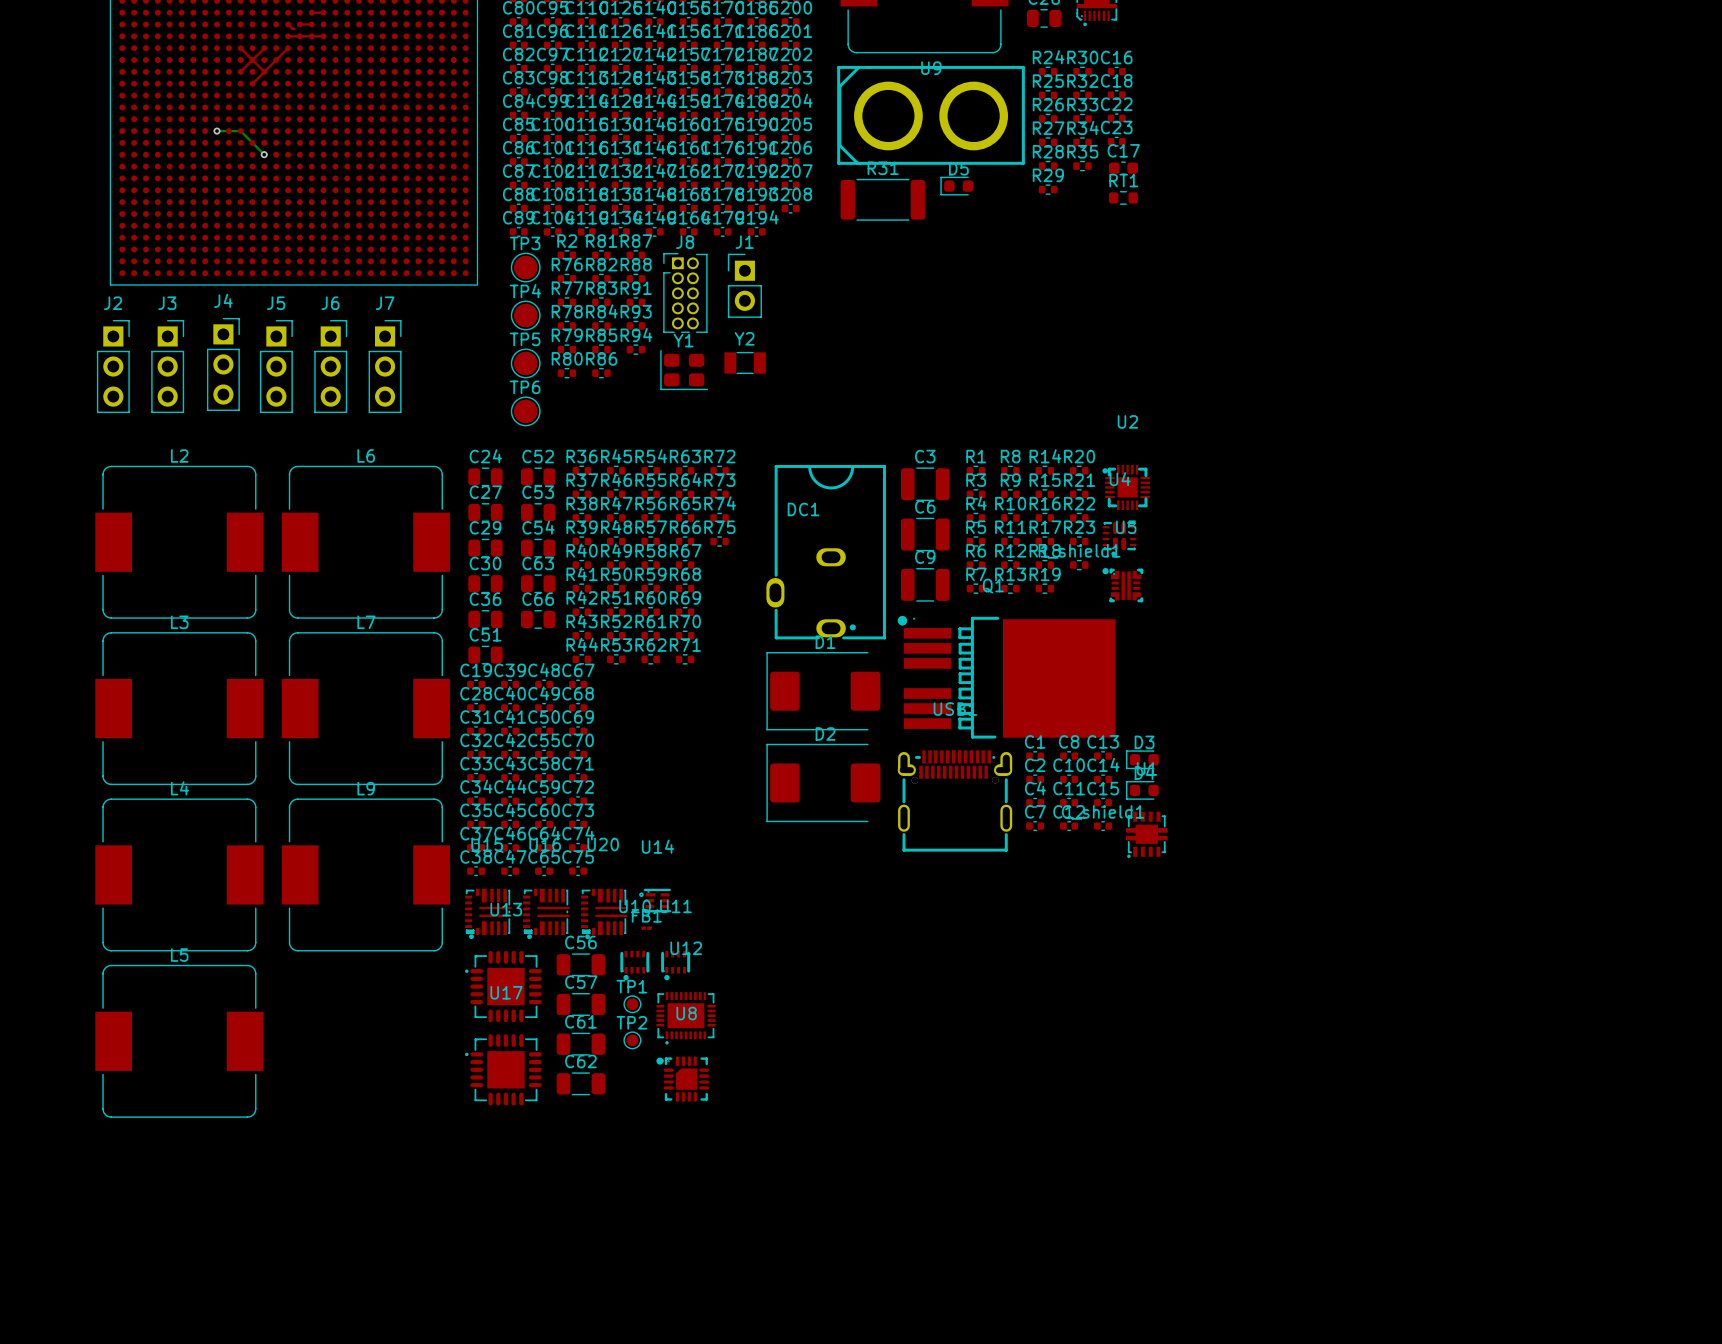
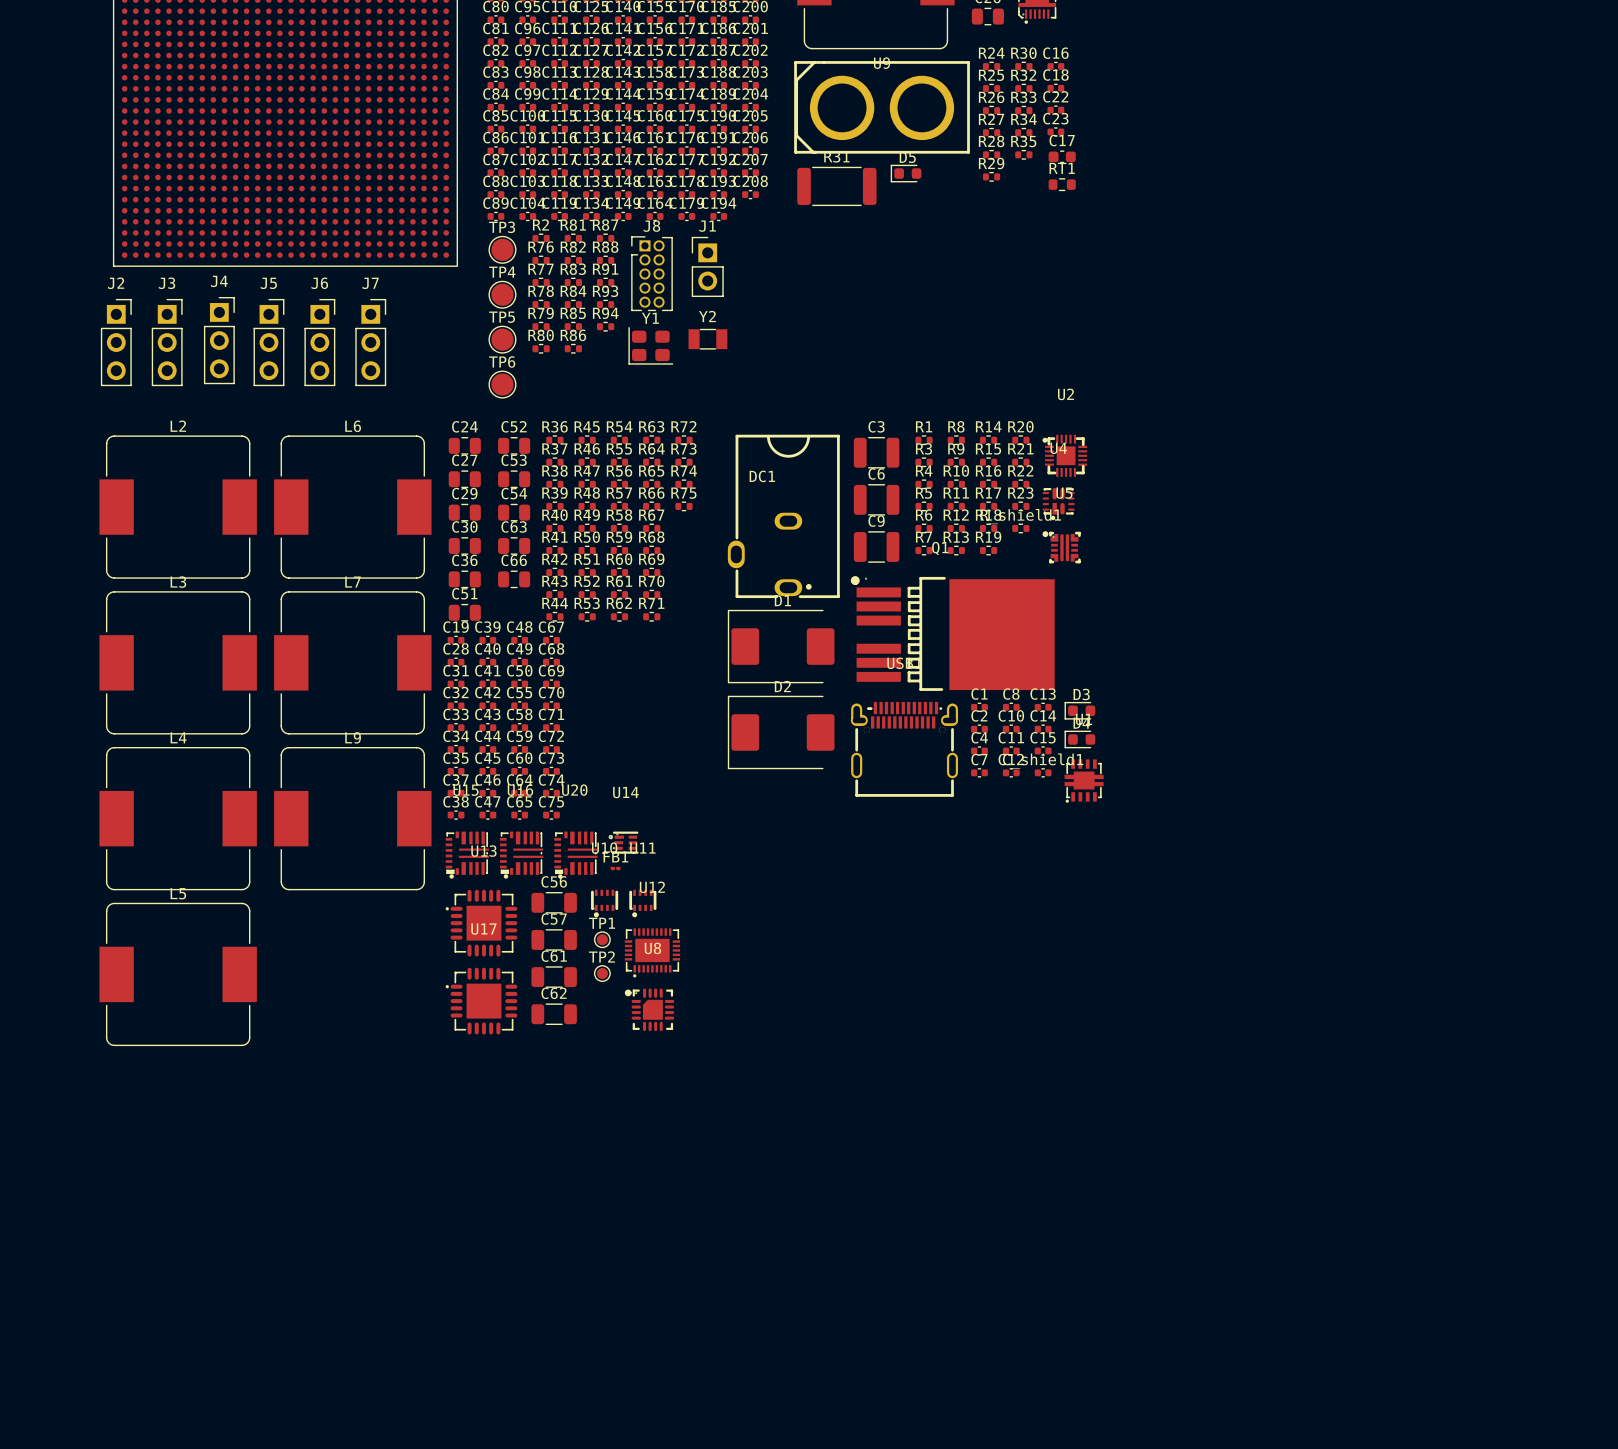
top track: (311, 12) (323, 12) -> none
top track: (288, 24) (294, 28) -> none
top track: (299, 24) (311, 24) -> none
top track: (288, 36) (323, 36) -> none
top track: (240, 48) (264, 71) -> none
top track: (264, 48) (240, 71) -> none
top track: (288, 48) (252, 83) -> none
bottom track: (216, 131) (240, 131) (264, 154) -> none
via: (216, 131) -> none
via: (264, 154) -> none

